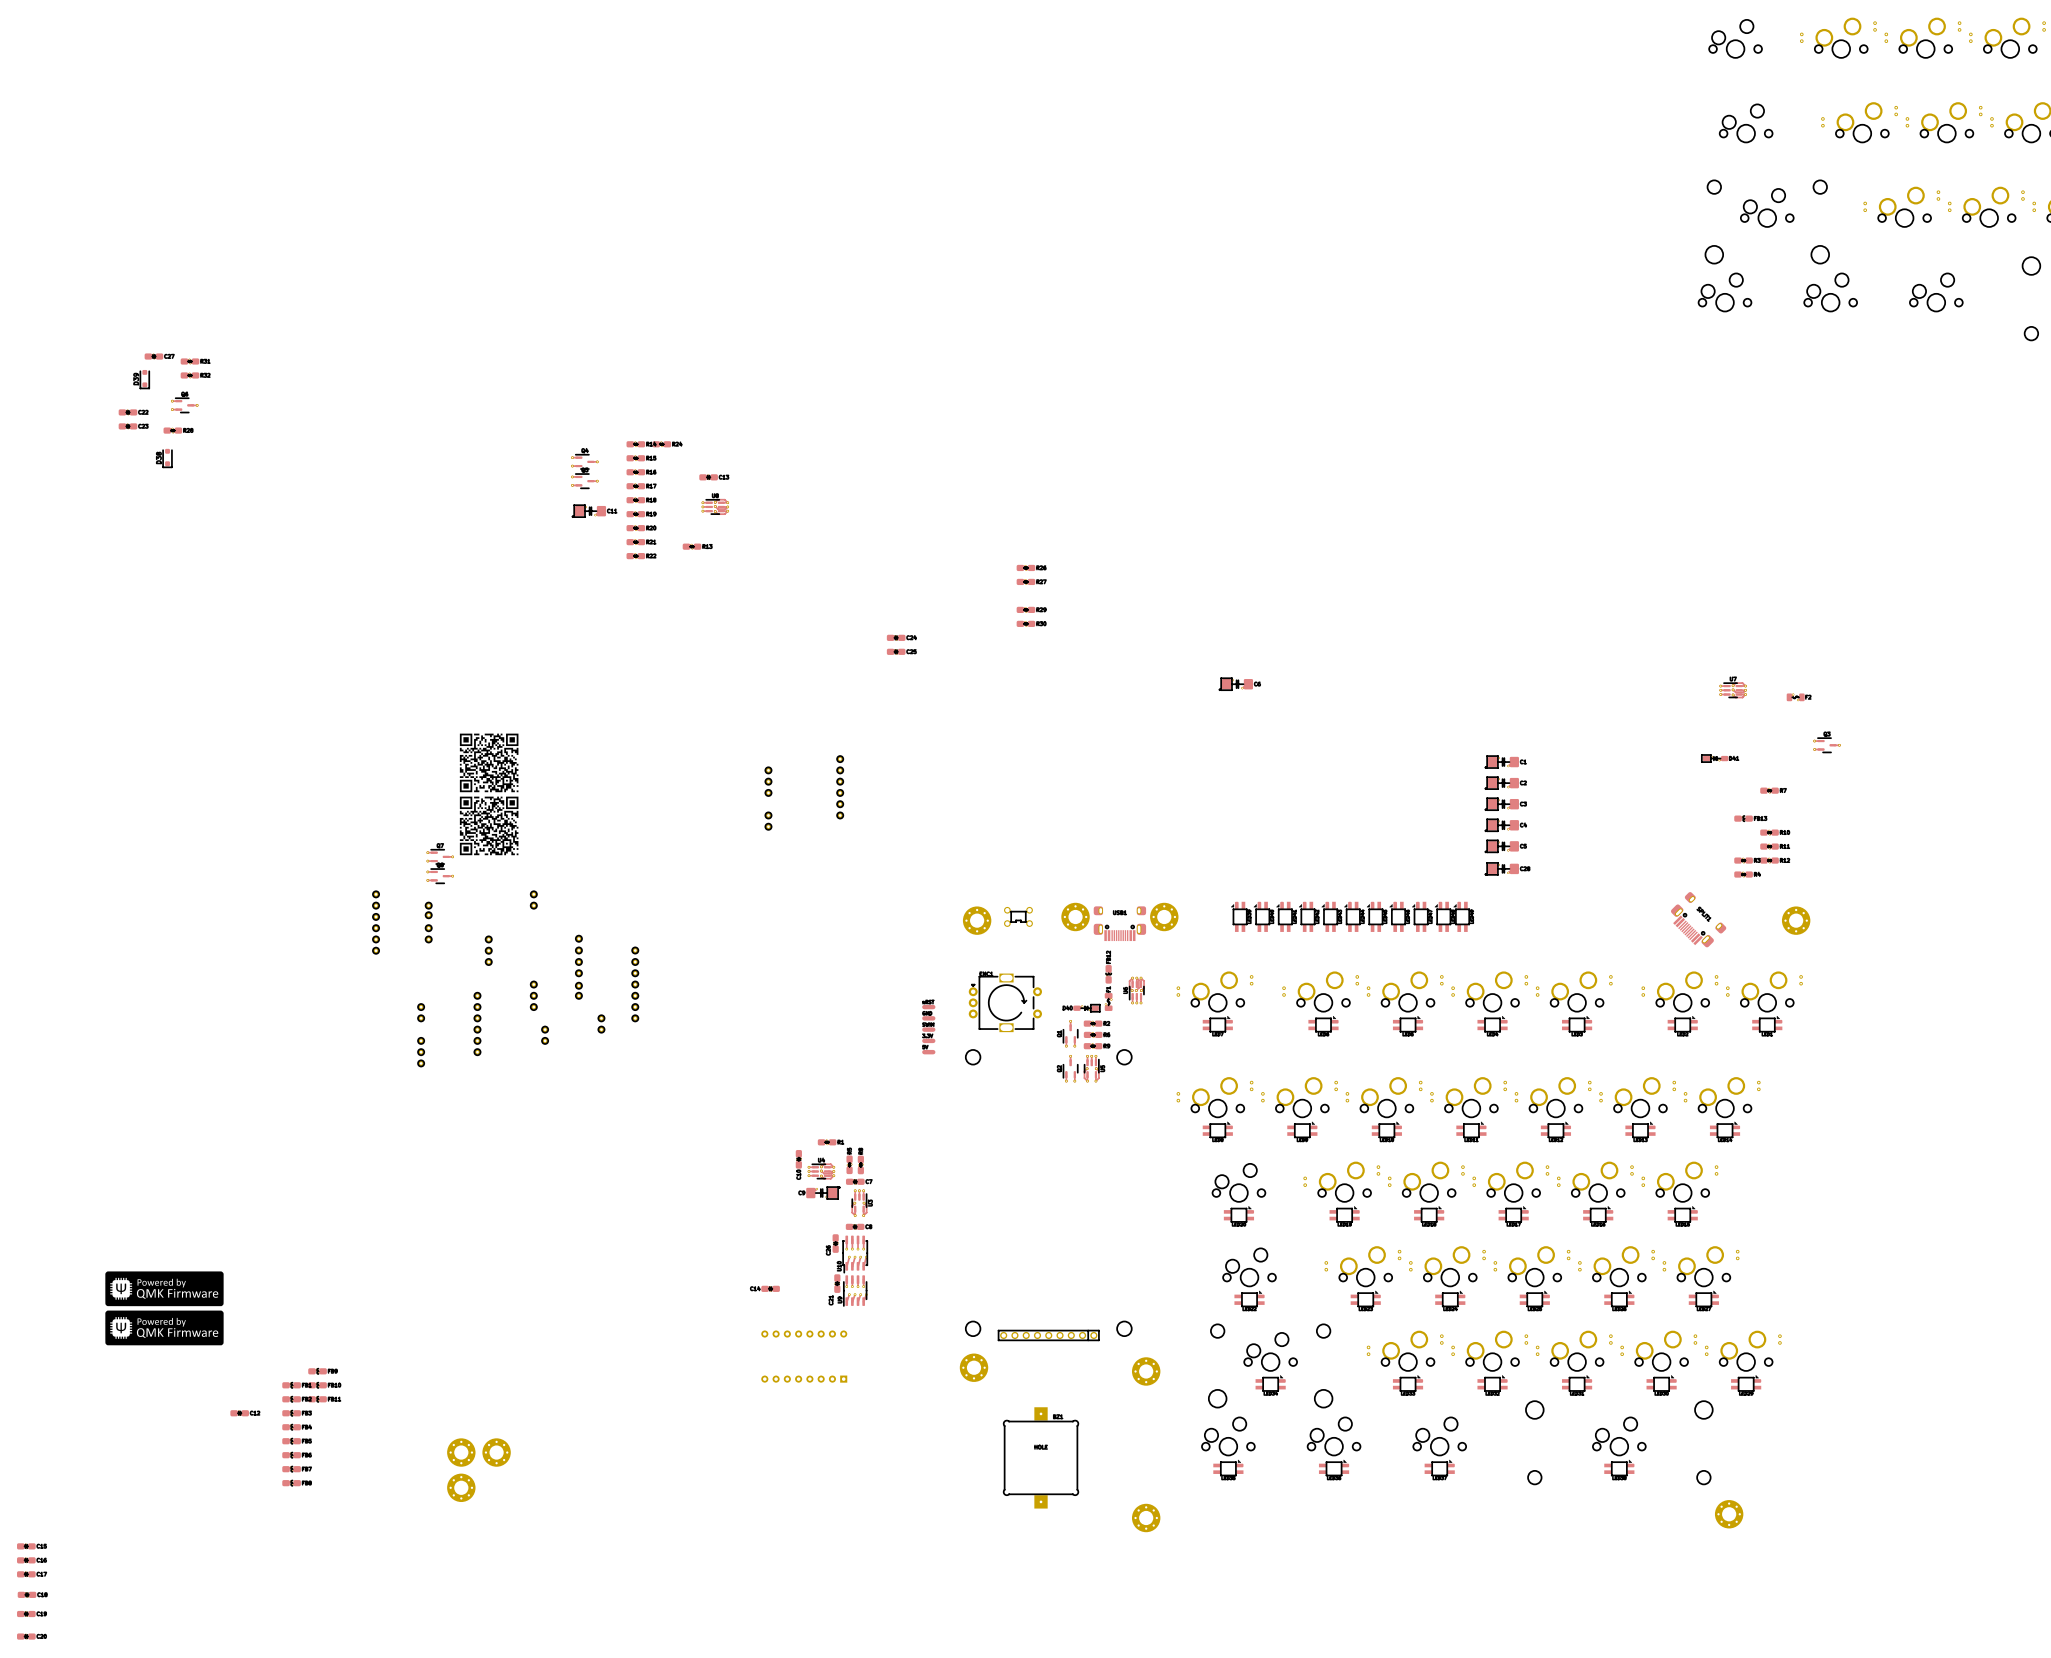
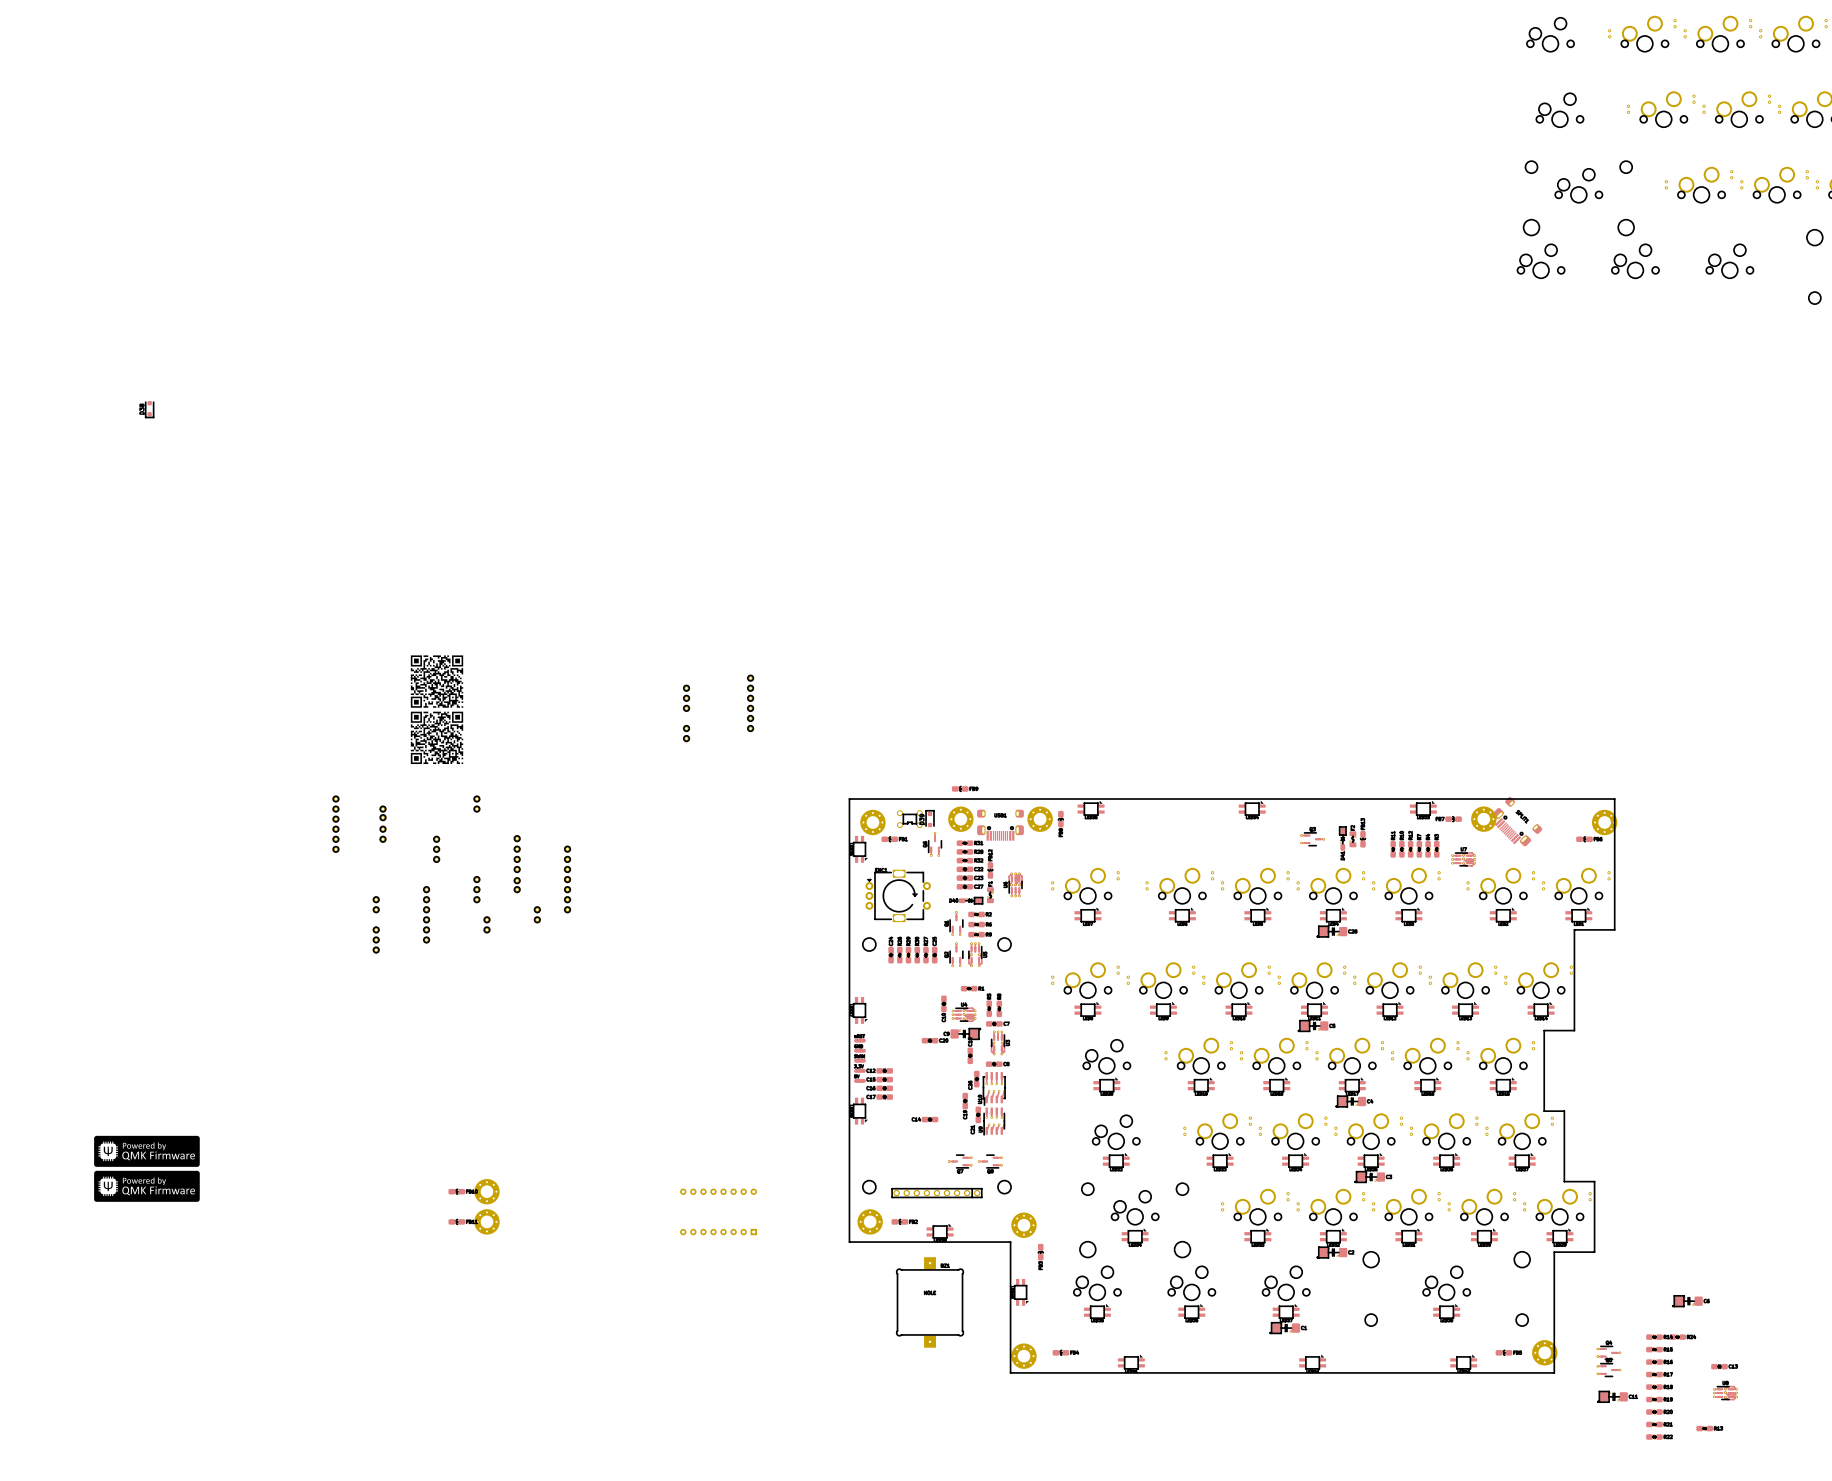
part position: (153, 356) -> (964, 886)
part position: (189, 361) -> (964, 843)
part position: (189, 375) -> (964, 860)
part rotation: 0° (144, 379) -> 180° (930, 818)
part position: (144, 379) -> (930, 818)
part rotation: 0° (184, 405) -> 90° counterclockwise (935, 844)
part position: (184, 405) -> (935, 844)
part position: (127, 412) -> (964, 869)
part position: (127, 426) -> (964, 878)
part position: (172, 430) -> (964, 851)
part position: (635, 444) -> (1654, 1337)
part position: (661, 444) -> (1677, 1337)
part position: (635, 458) -> (1654, 1349)
part position: (584, 461) -> (1608, 1352)
part position: (635, 472) -> (1654, 1362)
part position: (708, 477) -> (1719, 1366)
part position: (584, 481) -> (1608, 1370)
part position: (635, 486) -> (1654, 1374)
part position: (635, 500) -> (1654, 1387)
part position: (715, 506) -> (1725, 1393)
part position: (589, 511) -> (1612, 1396)
part position: (635, 514) -> (1654, 1399)
part position: (635, 528) -> (1654, 1412)
part position: (635, 542) -> (1654, 1424)
part position: (692, 546) -> (1704, 1428)
part position: (635, 556) -> (1654, 1437)
part rotation: 0° (1025, 567) -> 90° counterclockwise (899, 955)
part position: (1025, 567) -> (899, 955)
part rotation: 0° (1025, 581) -> 90° counterclockwise (925, 955)
part position: (1025, 581) -> (925, 955)
part rotation: 0° (1025, 609) -> 90° counterclockwise (908, 955)
part position: (1025, 609) -> (908, 955)
part rotation: 0° (1025, 623) -> 90° counterclockwise (917, 955)
part position: (1025, 623) -> (917, 955)
part rotation: 0° (896, 637) -> 90° counterclockwise (891, 955)
part position: (896, 637) -> (891, 955)
part rotation: 0° (896, 651) -> 90° counterclockwise (934, 955)
part position: (896, 651) -> (934, 955)
part position: (1235, 684) -> (1687, 1301)
part position: (1733, 690) -> (1463, 859)
part rotation: 0° (1795, 697) -> 90° counterclockwise (1352, 839)
part position: (1795, 697) -> (1352, 839)
part position: (1827, 745) -> (1312, 839)
part rotation: 0° (1714, 758) -> 90° clockwise (1342, 838)
part position: (1714, 758) -> (1342, 838)
part position: (1501, 762) -> (1284, 1328)
part position: (1501, 783) -> (1332, 1252)
part rotation: 0° (1769, 790) -> 90° counterclockwise (1419, 849)
part position: (1769, 790) -> (1419, 849)
part position: (1501, 804) -> (1369, 1177)
part rotation: 0° (1743, 818) -> 90° counterclockwise (1362, 839)
part position: (1743, 818) -> (1362, 839)
part position: (1501, 825) -> (1350, 1101)
part rotation: 0° (1769, 832) -> 90° counterclockwise (1401, 849)
part position: (1769, 832) -> (1401, 849)
part position: (1501, 846) -> (1313, 1026)
part rotation: 0° (1769, 846) -> 90° counterclockwise (1393, 849)
part position: (1769, 846) -> (1393, 849)
part rotation: 0° (440, 856) -> 180° (960, 1161)
part position: (440, 856) -> (960, 1161)
part rotation: 0° (1743, 860) -> 90° counterclockwise (1436, 849)
part position: (1743, 860) -> (1436, 849)
part rotation: 0° (1769, 860) -> 90° counterclockwise (1410, 849)
part position: (1769, 860) -> (1410, 849)
part position: (1501, 868) -> (1332, 931)
part rotation: 0° (1743, 874) -> 90° counterclockwise (1428, 849)
part position: (1743, 874) -> (1428, 849)
part rotation: 0° (440, 876) -> 180° (990, 1161)
part position: (440, 876) -> (990, 1161)
board edge: none -> (849, 799) (849, 1242) (1010, 1242) (1010, 1372) (1554, 1372) (1554, 1252) (1594, 1252) (1594, 1181) (1564, 1181) (1564, 1111) (1544, 1111) (1544, 1030) (1574, 1030) (1574, 929) (1614, 929) (1614, 799) (849, 799)
part: none -> (1091, 808)
part: none -> (1252, 808)
part: none -> (1423, 808)
part rotation: 0° (1239, 916) -> 90° clockwise (940, 1231)
part position: (1239, 916) -> (940, 1231)
part rotation: 0° (1261, 916) -> 180° (1021, 1292)
part position: (1261, 916) -> (1021, 1292)
part rotation: 0° (1284, 916) -> 90° clockwise (1131, 1361)
part position: (1284, 916) -> (1131, 1361)
part rotation: 0° (1306, 916) -> 90° clockwise (1312, 1361)
part position: (1306, 916) -> (1312, 1361)
part rotation: 0° (1329, 916) -> 90° clockwise (1463, 1361)
part position: (1329, 916) -> (1463, 1361)
part: (1352, 916) -> none
part: (1374, 916) -> none
part: (1397, 916) -> none
part: (1420, 916) -> none
part: (1442, 916) -> none
part: (1461, 916) -> none
part: none -> (1483, 819)
part: none -> (860, 849)
part: (928, 1029) -> none
part: none -> (860, 1010)
part position: (827, 1142) -> (969, 988)
part position: (798, 1159) -> (943, 1003)
part position: (849, 1164) -> (989, 1008)
part position: (860, 1164) -> (999, 1008)
part position: (821, 1171) -> (964, 1014)
part position: (855, 1181) -> (994, 1023)
part: none -> (859, 1060)
part position: (823, 1192) -> (965, 1033)
part position: (859, 1203) -> (998, 1043)
part position: (855, 1226) -> (994, 1064)
part position: (835, 1243) -> (976, 1079)
part: none -> (860, 1111)
part position: (855, 1254) -> (994, 1088)
part position: (837, 1283) -> (978, 1114)
part position: (770, 1288) -> (930, 1119)
part position: (855, 1290) -> (994, 1121)
part: none -> (486, 1191)
part: none -> (486, 1221)
part position: (317, 1371) -> (960, 788)
part position: (291, 1385) -> (889, 839)
part position: (317, 1385) -> (456, 1191)
part position: (291, 1399) -> (899, 1221)
part position: (317, 1399) -> (456, 1221)
part rotation: 0° (239, 1413) -> 180° (884, 1070)
part position: (239, 1413) -> (884, 1070)
part rotation: 0° (291, 1413) -> 90° clockwise (1040, 1252)
part position: (291, 1413) -> (1040, 1252)
part position: (291, 1427) -> (1060, 1352)
part position: (291, 1441) -> (1503, 1352)
part: (461, 1452) -> none
part: (496, 1452) -> none
part position: (291, 1455) -> (1584, 839)
part rotation: 0° (291, 1469) -> 180° (1453, 819)
part position: (291, 1469) -> (1453, 819)
part rotation: 0° (291, 1483) -> 90° clockwise (1060, 819)
part position: (291, 1483) -> (1060, 819)
part: (461, 1487) -> none
part rotation: 0° (26, 1546) -> 180° (884, 1079)
part position: (26, 1546) -> (884, 1079)
part rotation: 0° (26, 1560) -> 180° (884, 1088)
part position: (26, 1560) -> (884, 1088)
part rotation: 0° (26, 1574) -> 180° (884, 1097)
part position: (26, 1574) -> (884, 1097)
part rotation: 0° (27, 1594) -> 90° counterclockwise (970, 1055)
part position: (27, 1594) -> (970, 1055)
part rotation: 0° (26, 1614) -> 90° clockwise (965, 1101)
part position: (26, 1614) -> (965, 1101)
part position: (26, 1636) -> (930, 1040)

